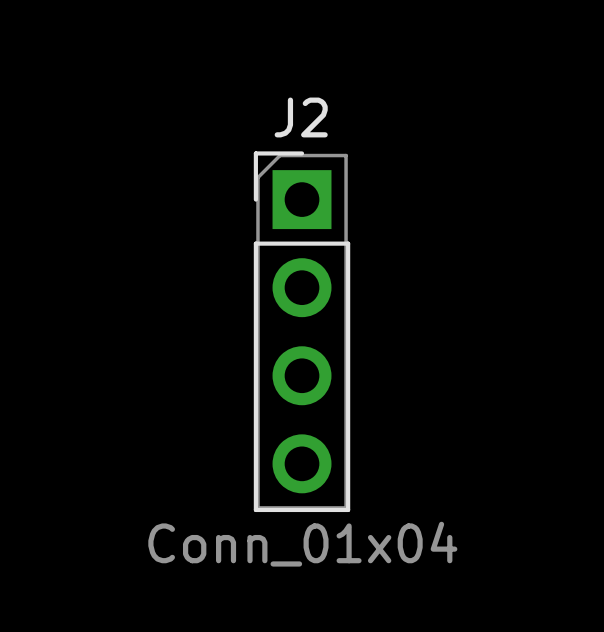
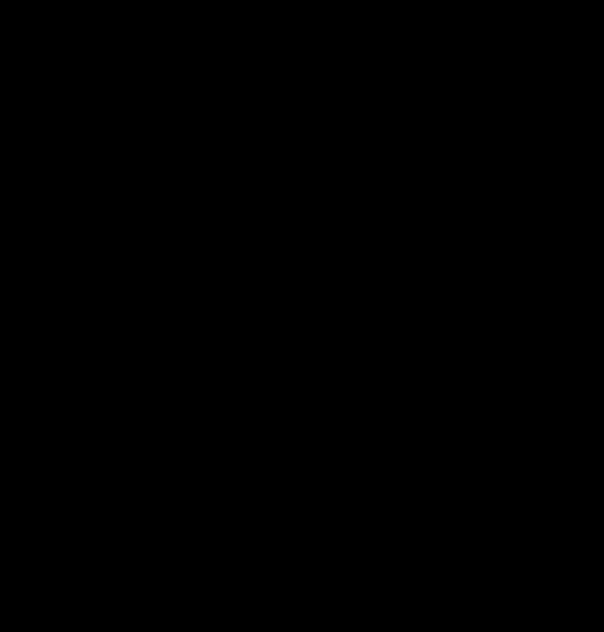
J2: Conn_01x04 (302, 331) -> none

